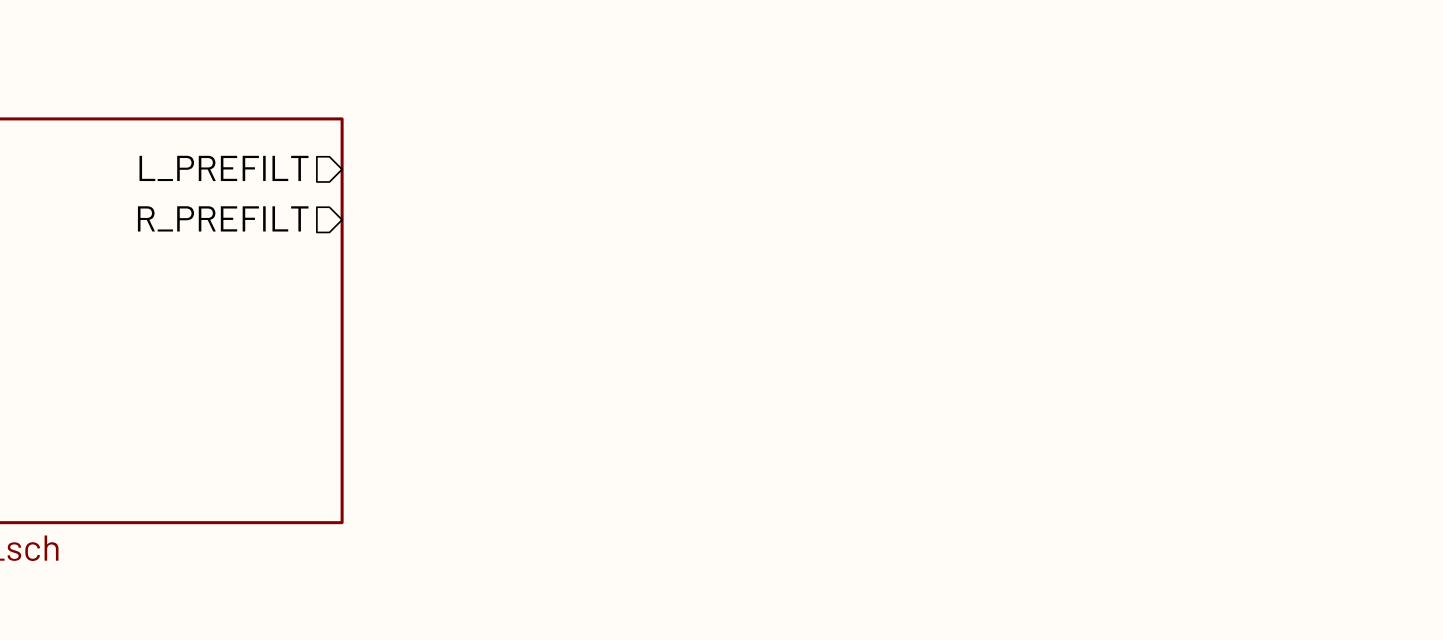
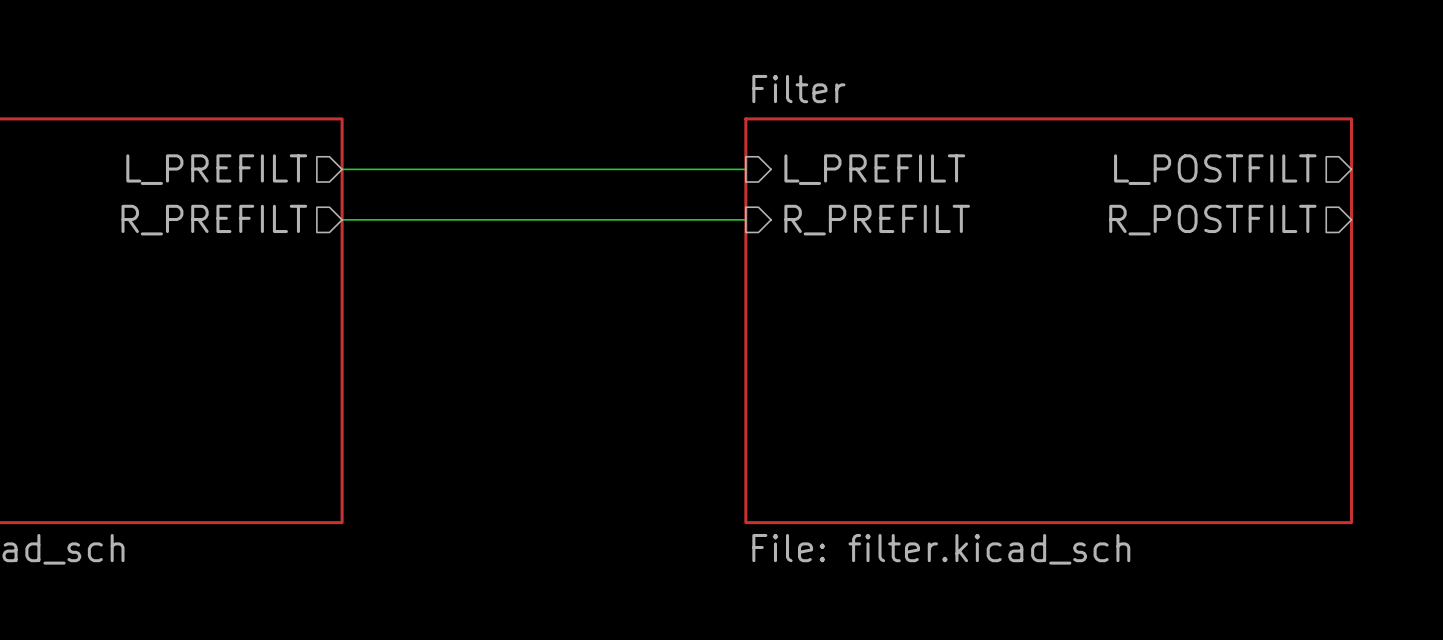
sheet pin: none -> L_PREFILT (874, 169)
sheet pin: none -> L_POSTFILT (1215, 169)
wire: none -> (342, 169) (745, 169)
sheet pin: none -> R_PREFILT (877, 220)
sheet pin: none -> R_POSTFILT (1212, 220)
wire: none -> (342, 219) (745, 219)
sheet Filter: none -> File: filter.kicad_sch (1048, 320)

